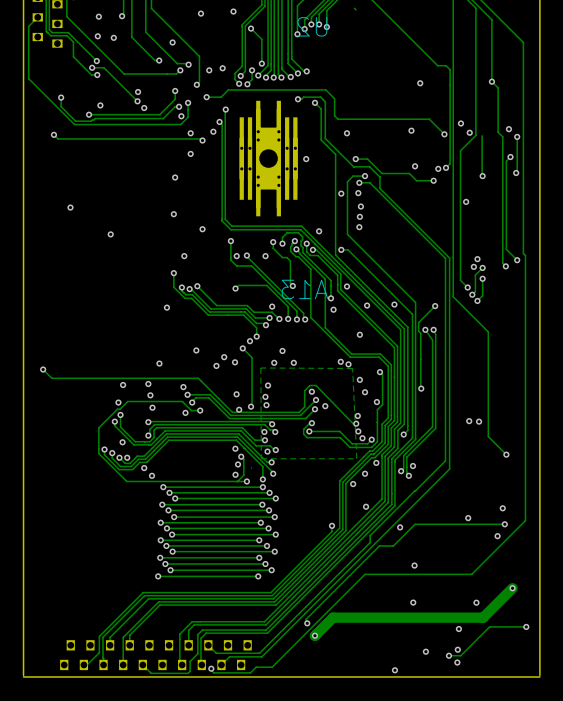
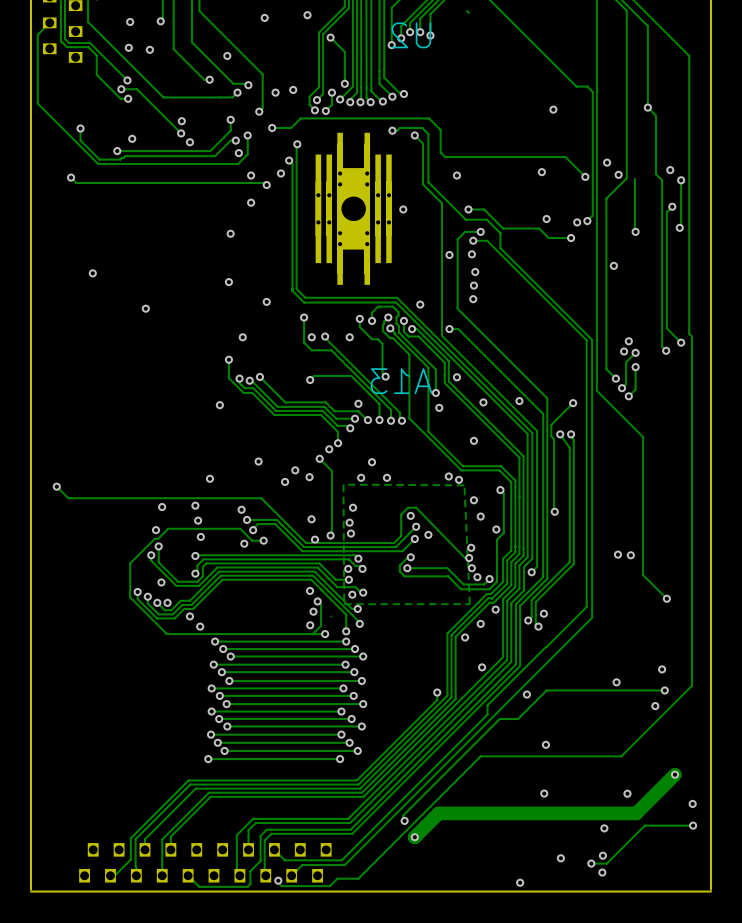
via: none -> (692, 803)

